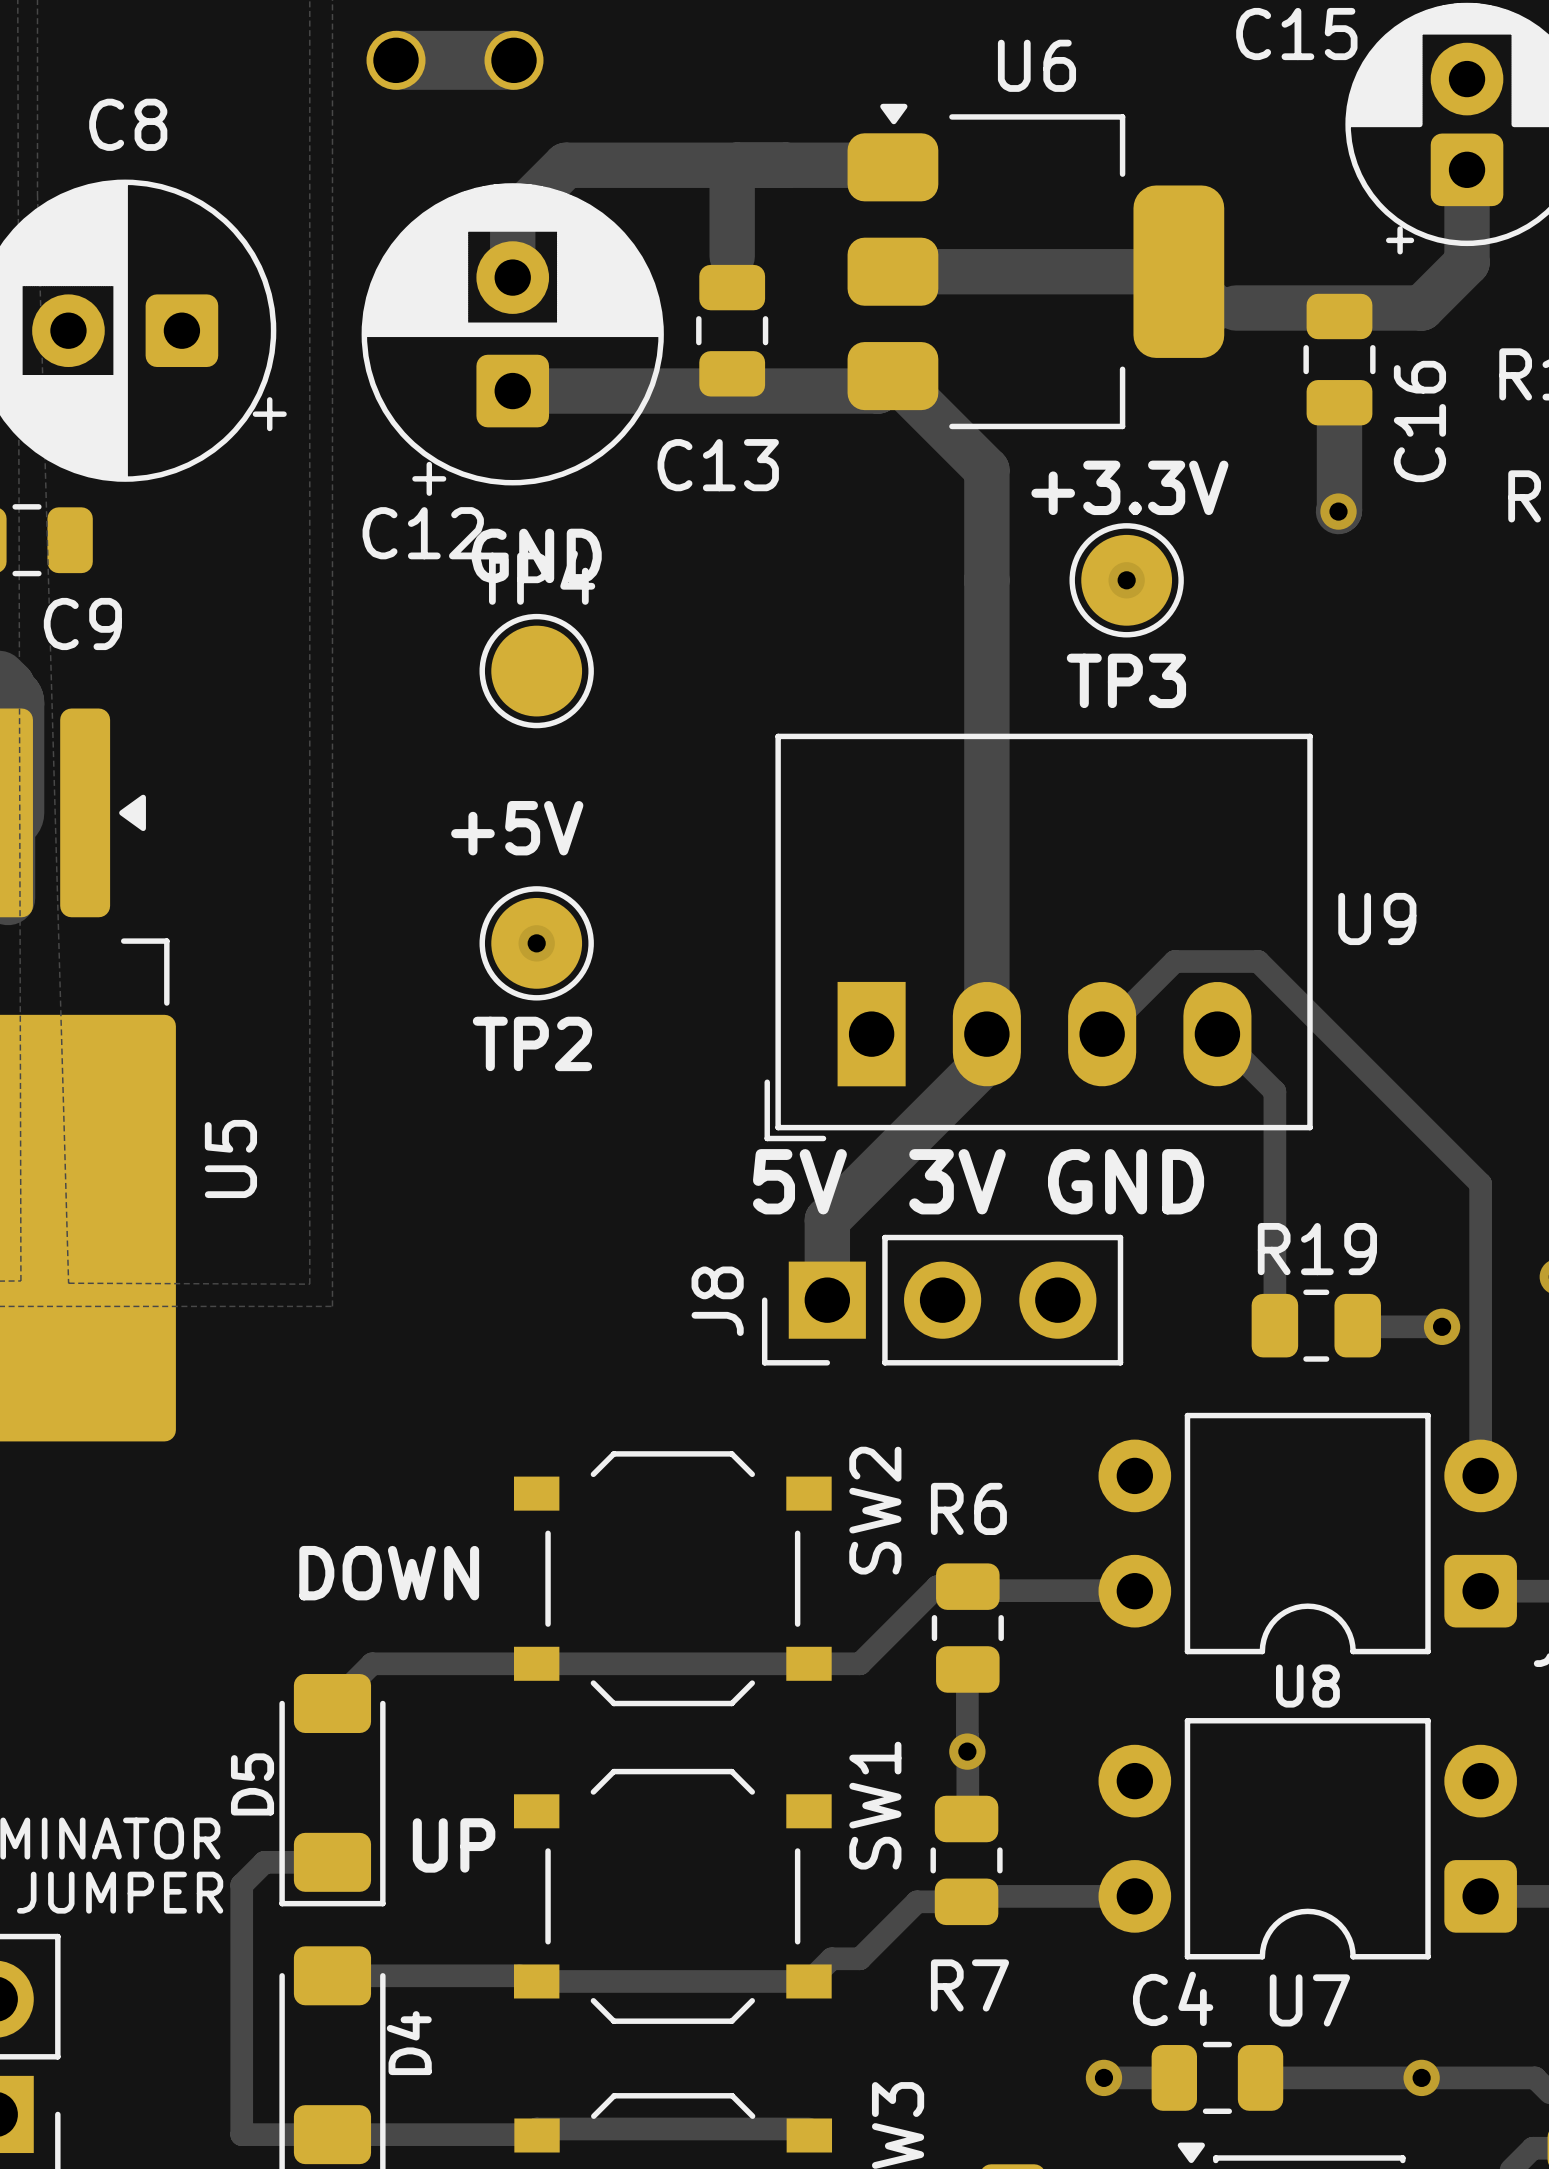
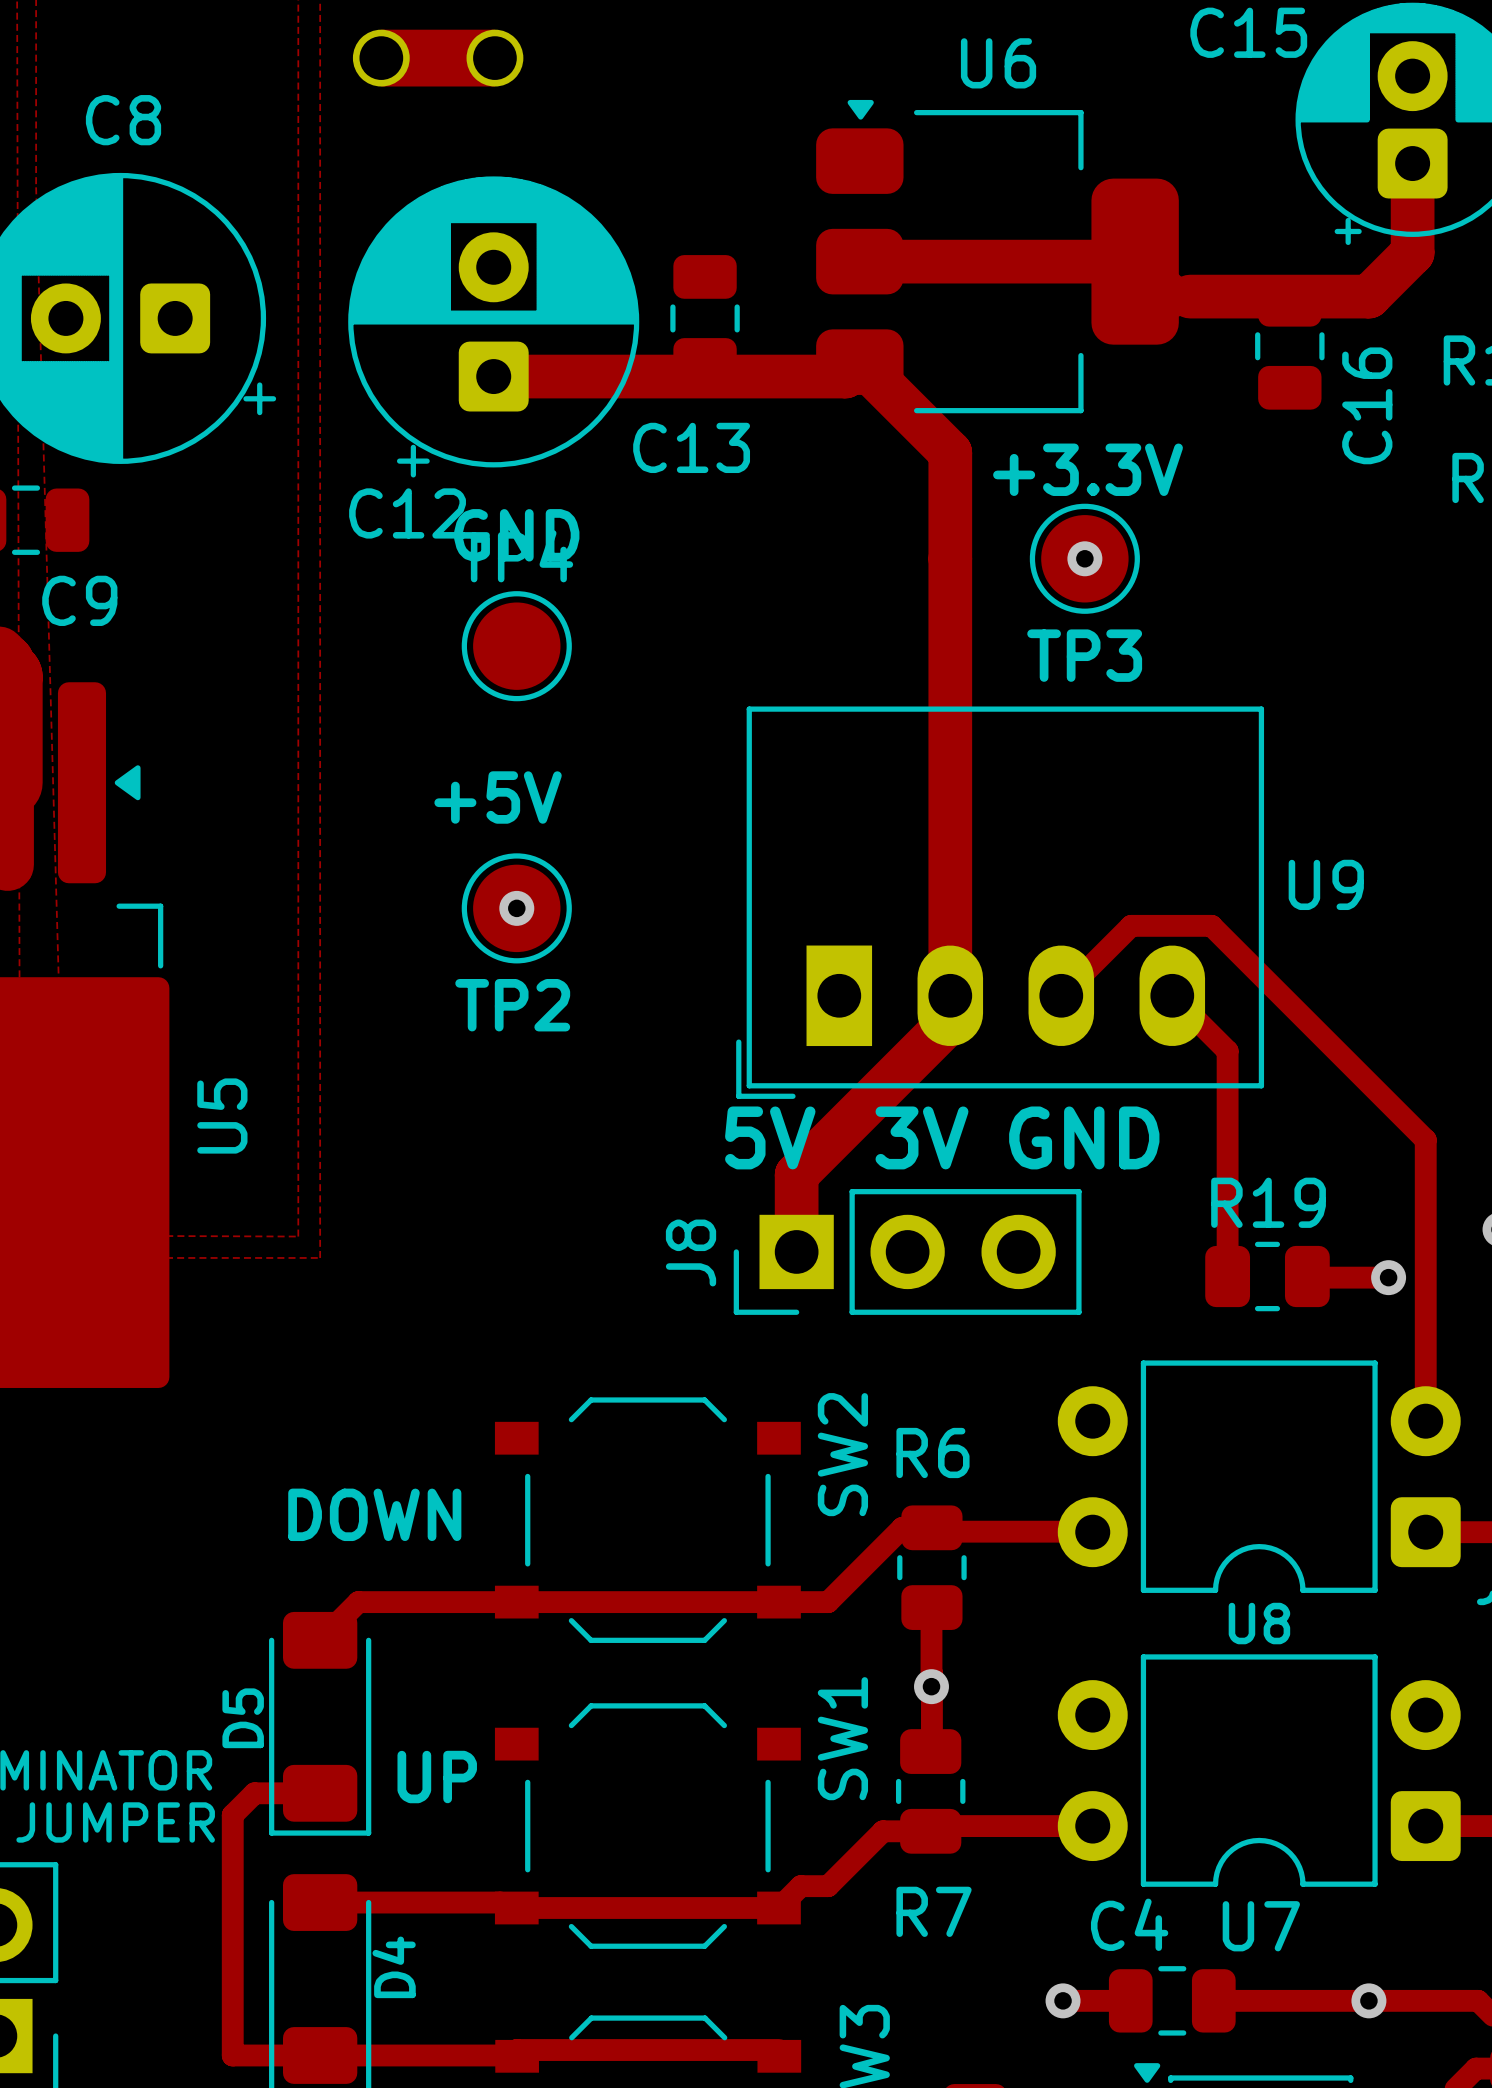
track: (736, 165) (732, 169) (732, 256) -> none
track: (913, 165) (565, 165) (512, 218) (512, 277) -> none
track: (1339, 402) (1338, 511) -> none
via: (1338, 511) -> none

